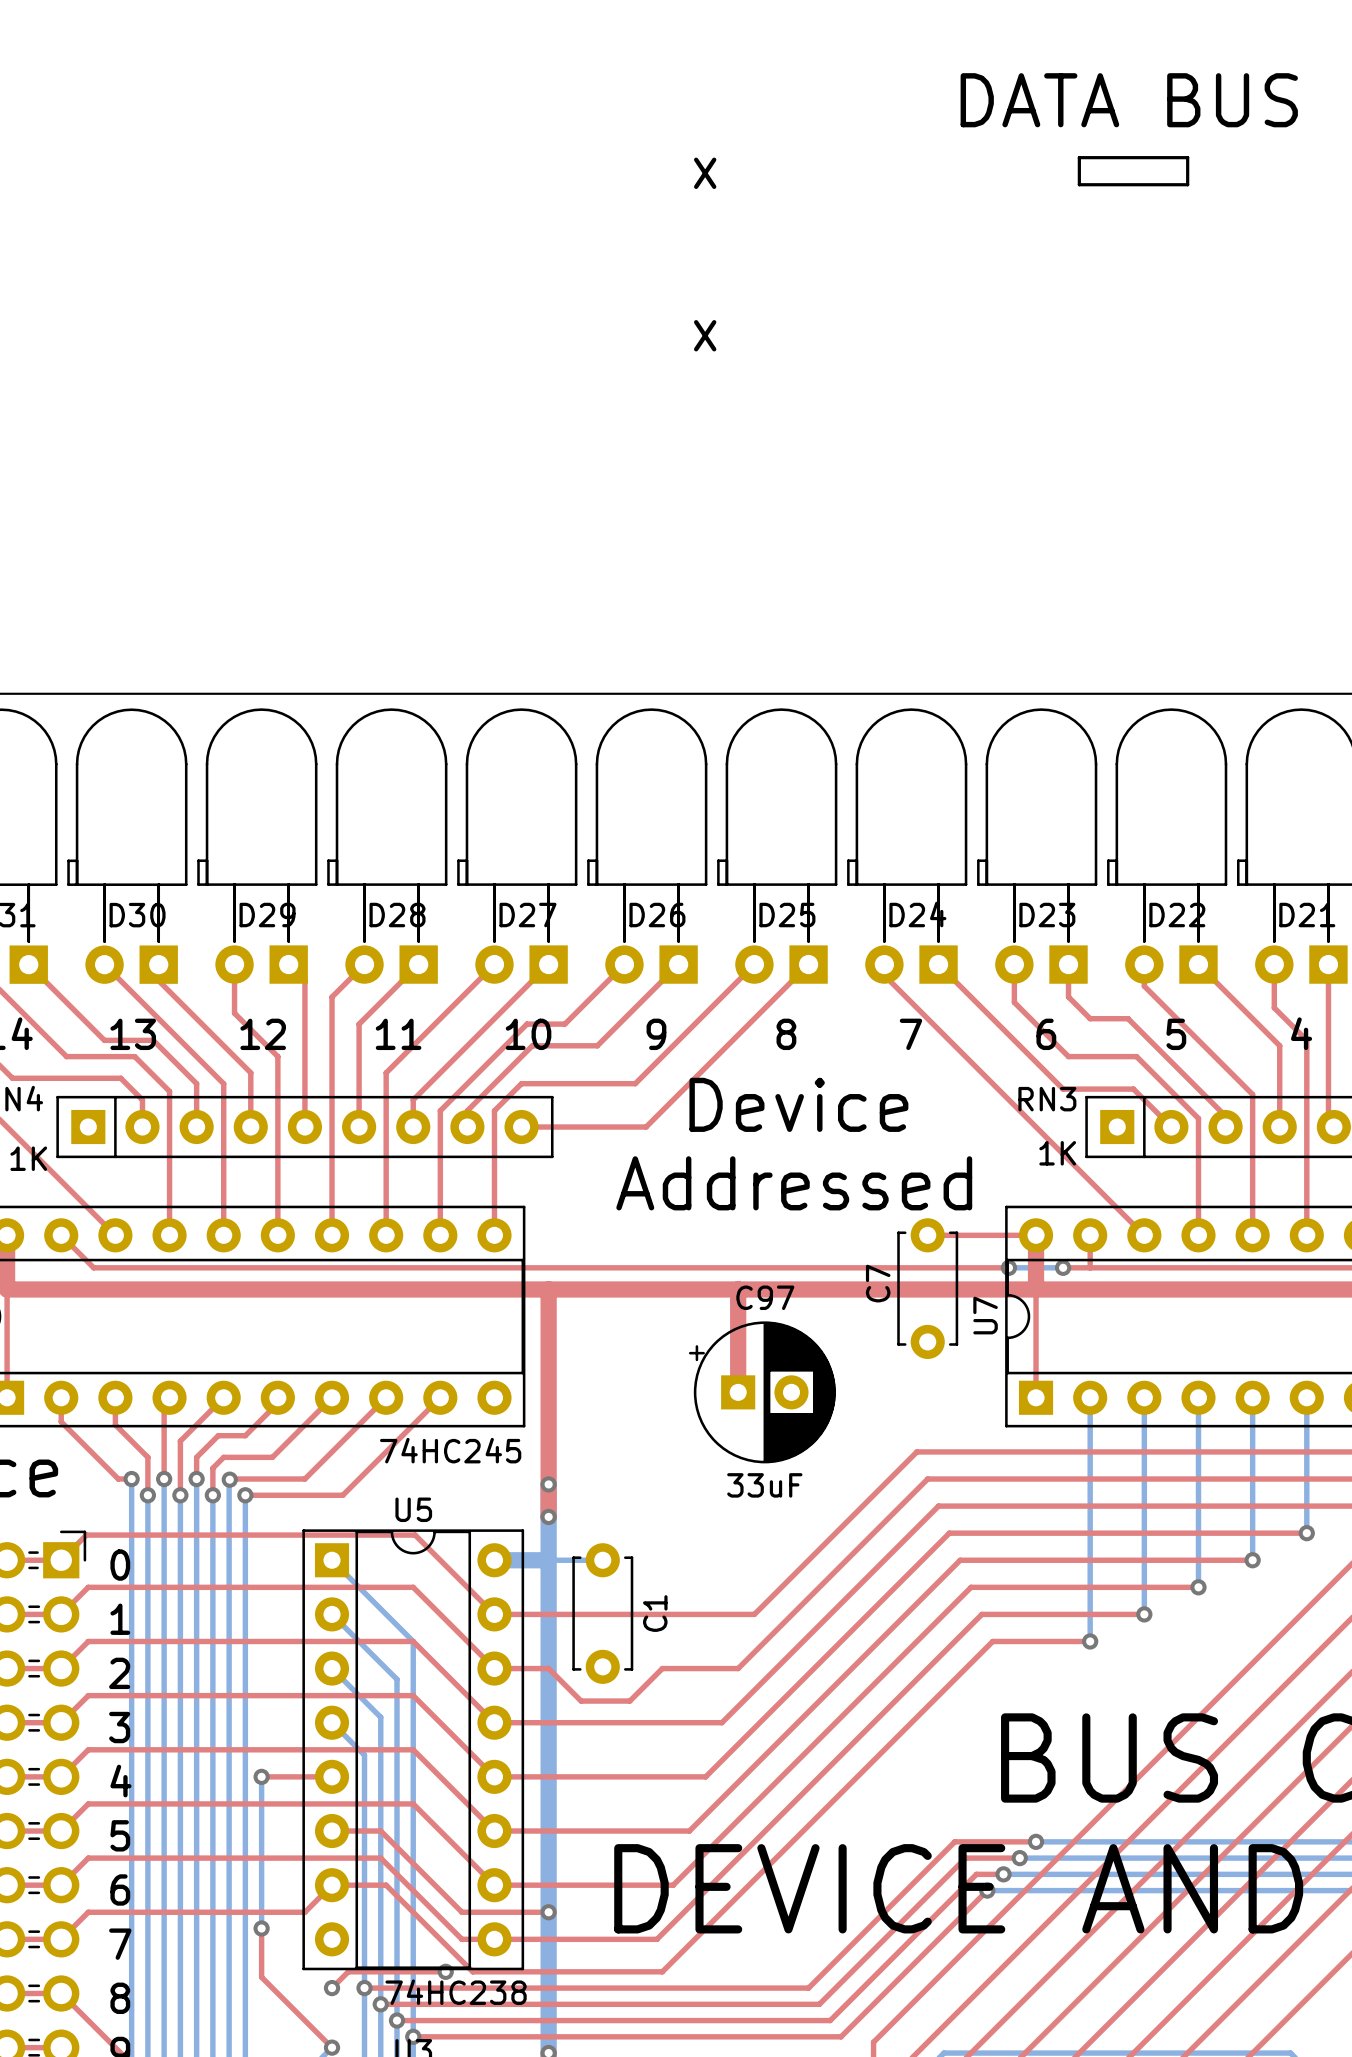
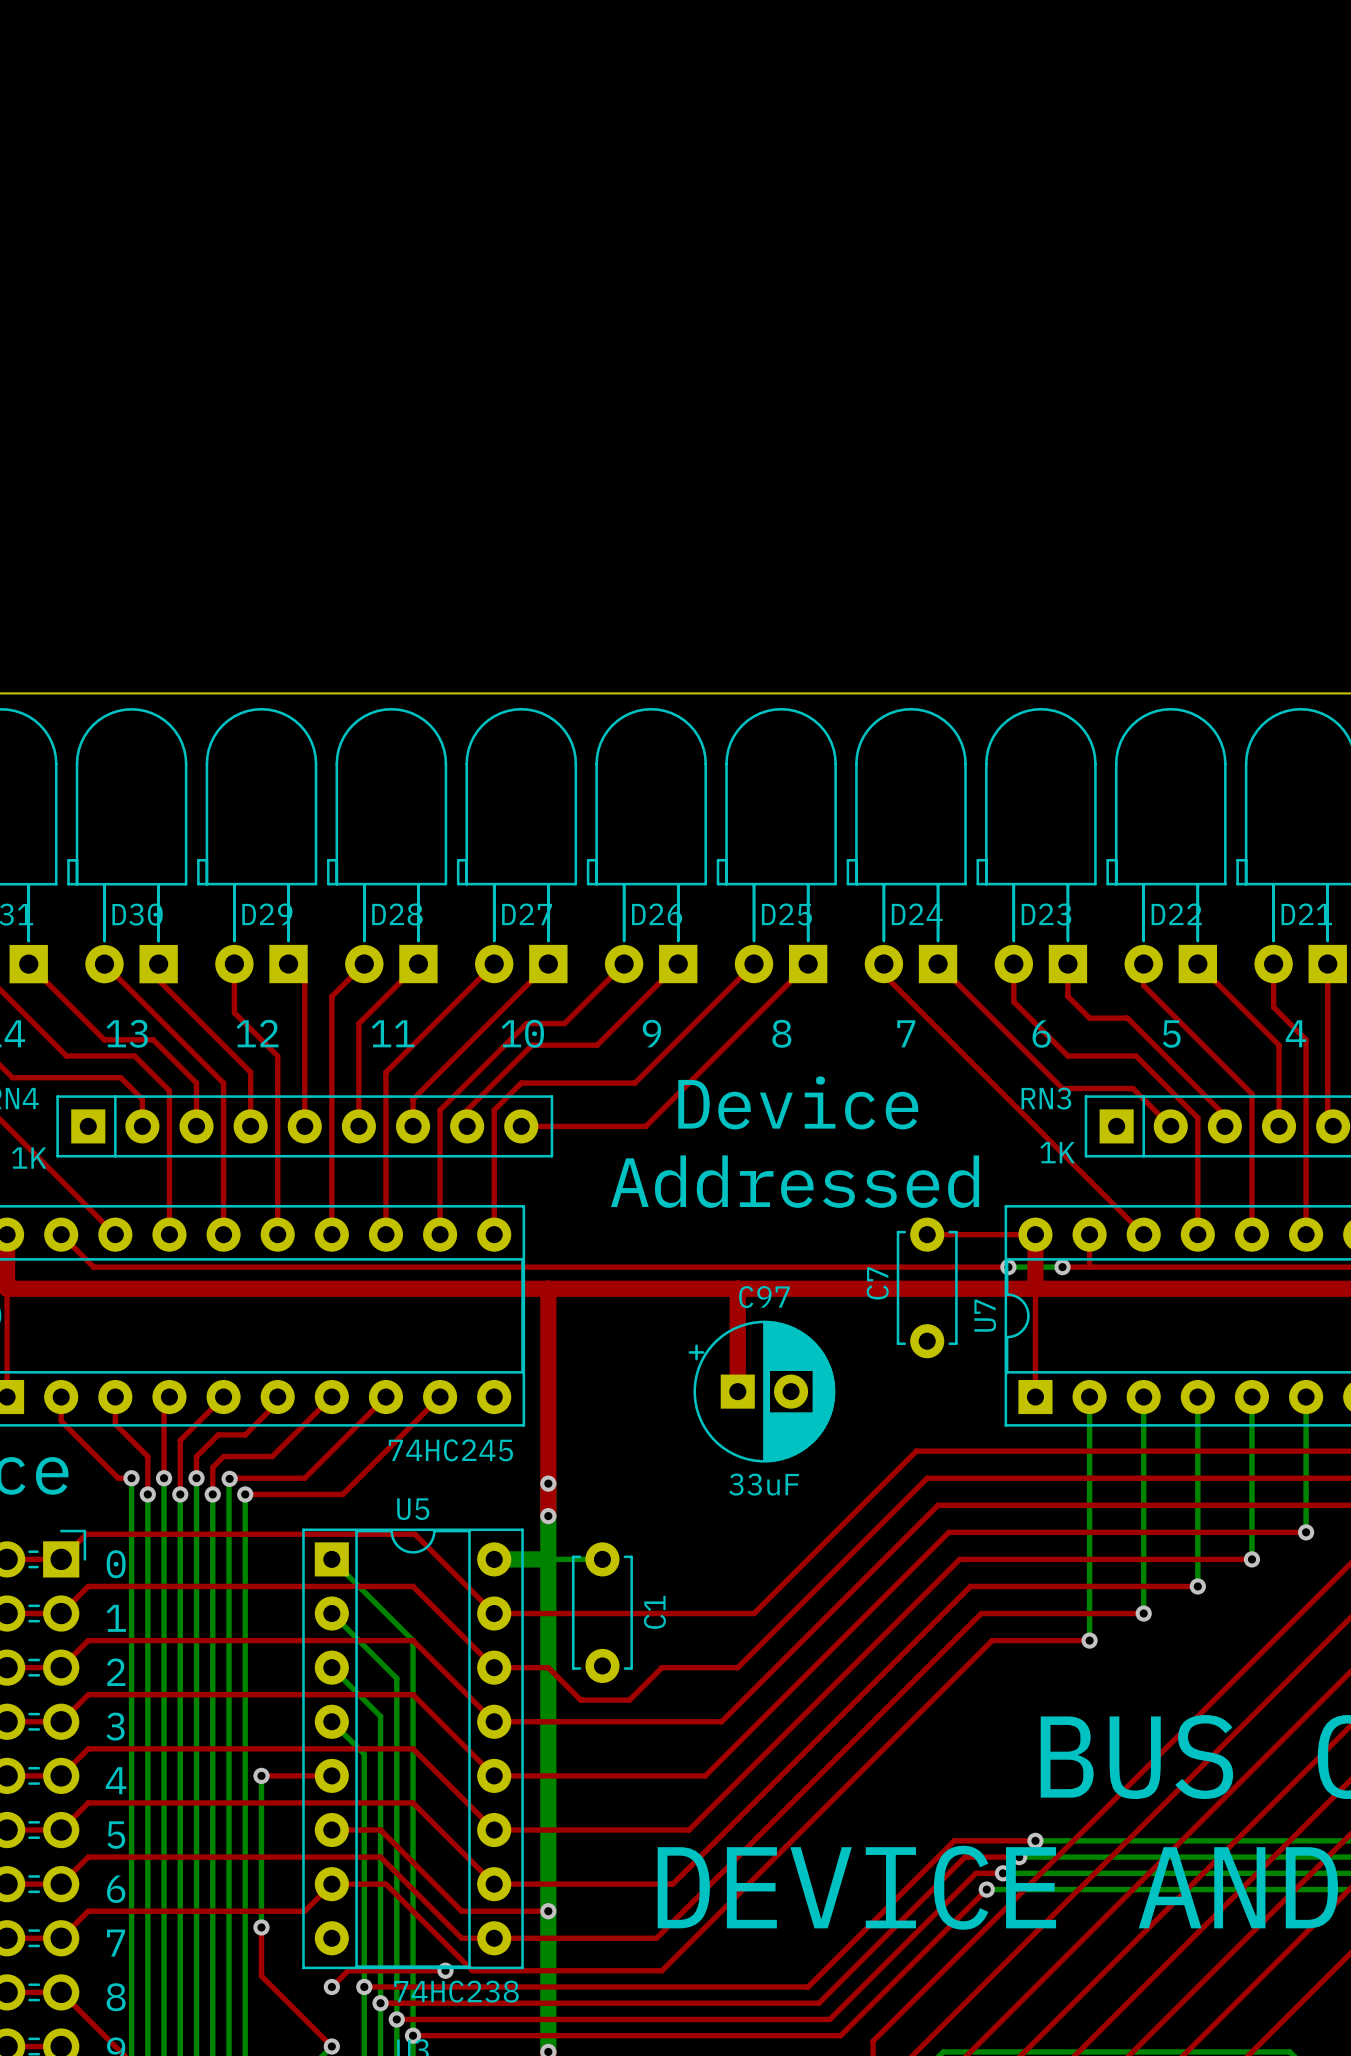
text: DATA BUS (1129, 100) -> none
line: (1079, 157) (1079, 184) (1187, 184) (1187, 157) (1079, 157) -> none
text: X (705, 173) -> none
text: X (705, 335) -> none

